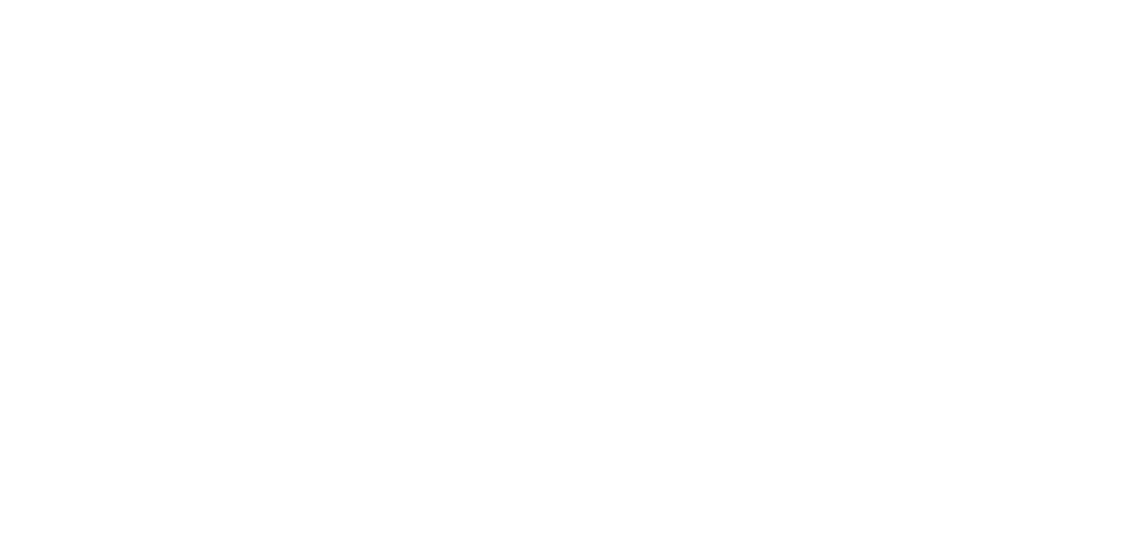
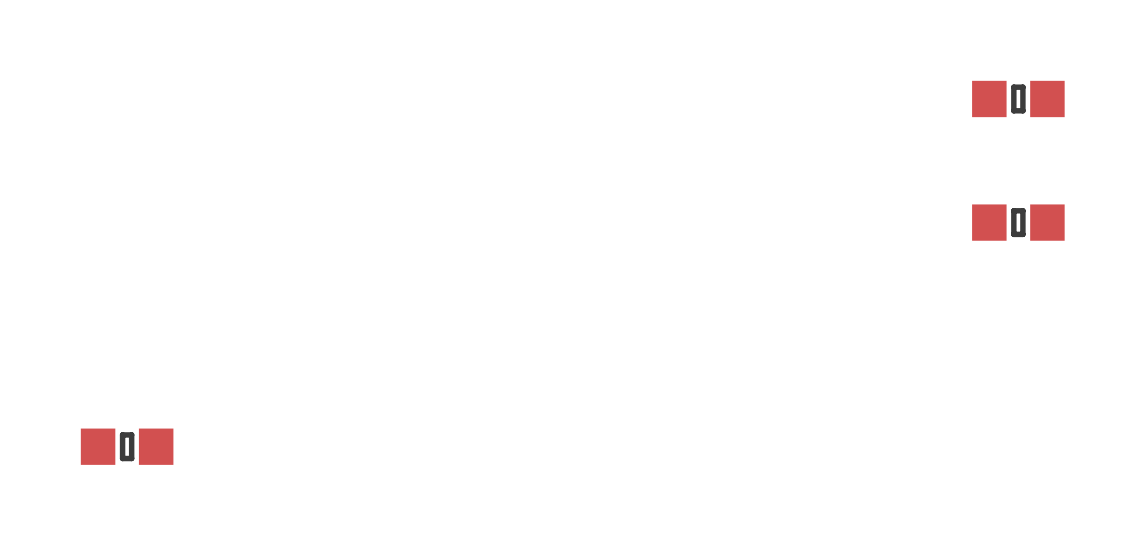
part: none -> (1018, 98)
part: none -> (1018, 222)
part: none -> (127, 446)

